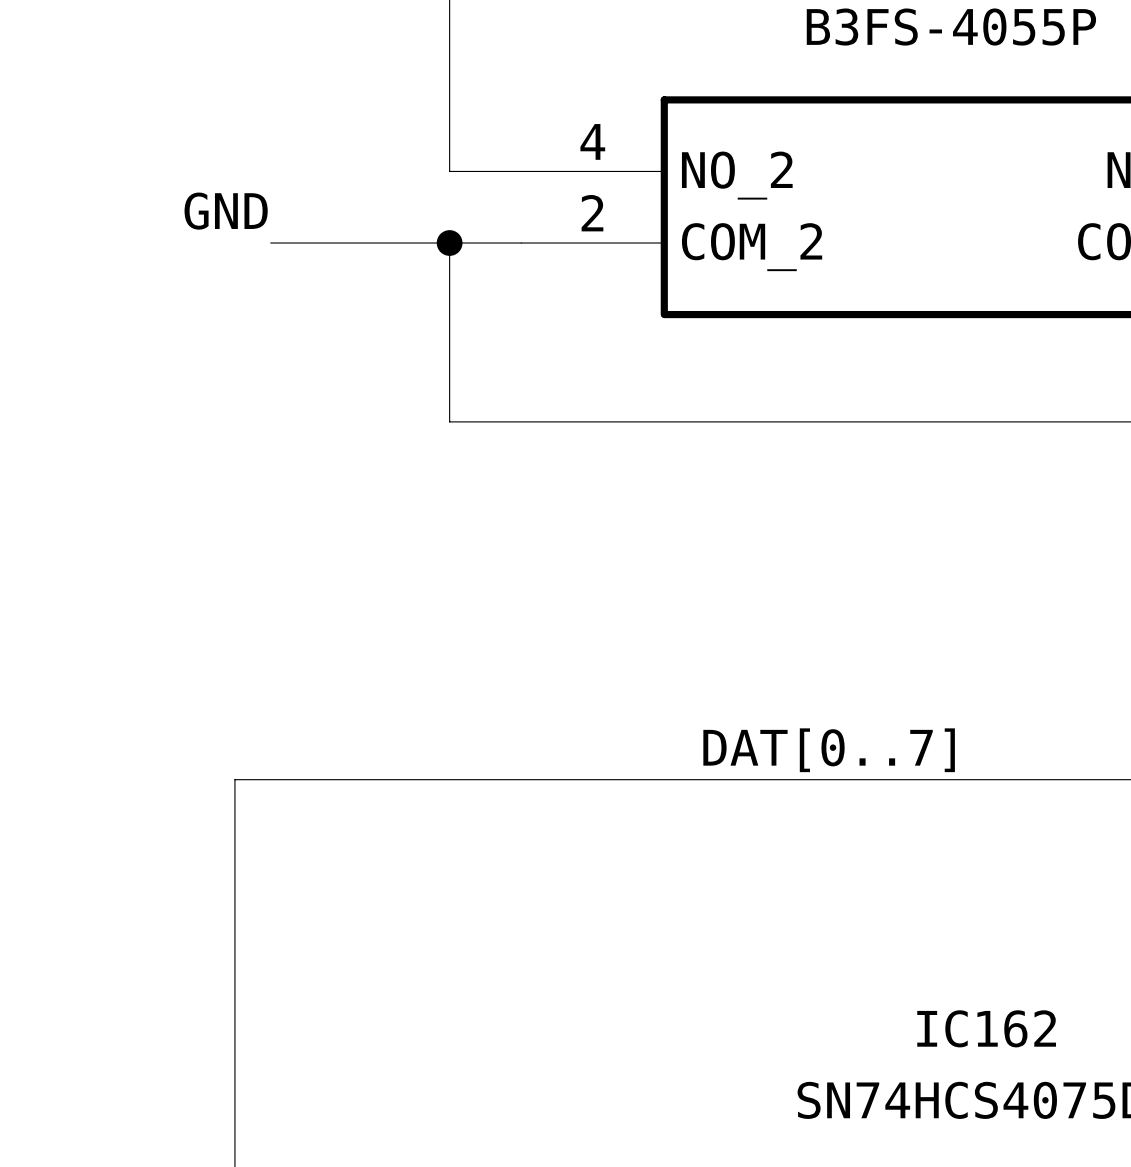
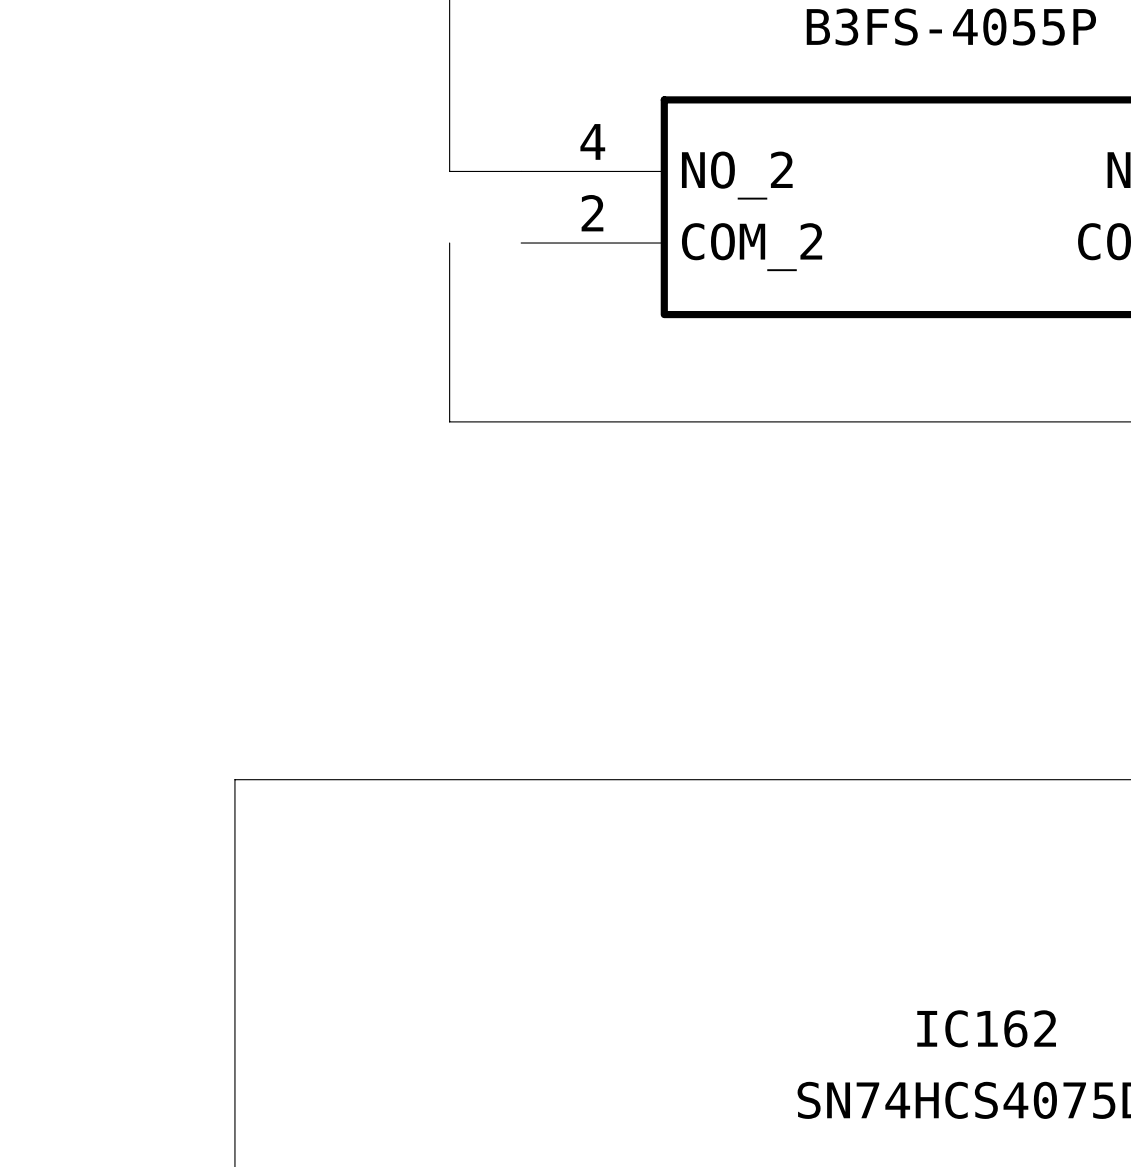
label: GND (226, 211) -> none
wire: (270, 243) (521, 243) -> none
junction: (449, 243) -> none
label: DAT[0..7] (829, 750) -> none

